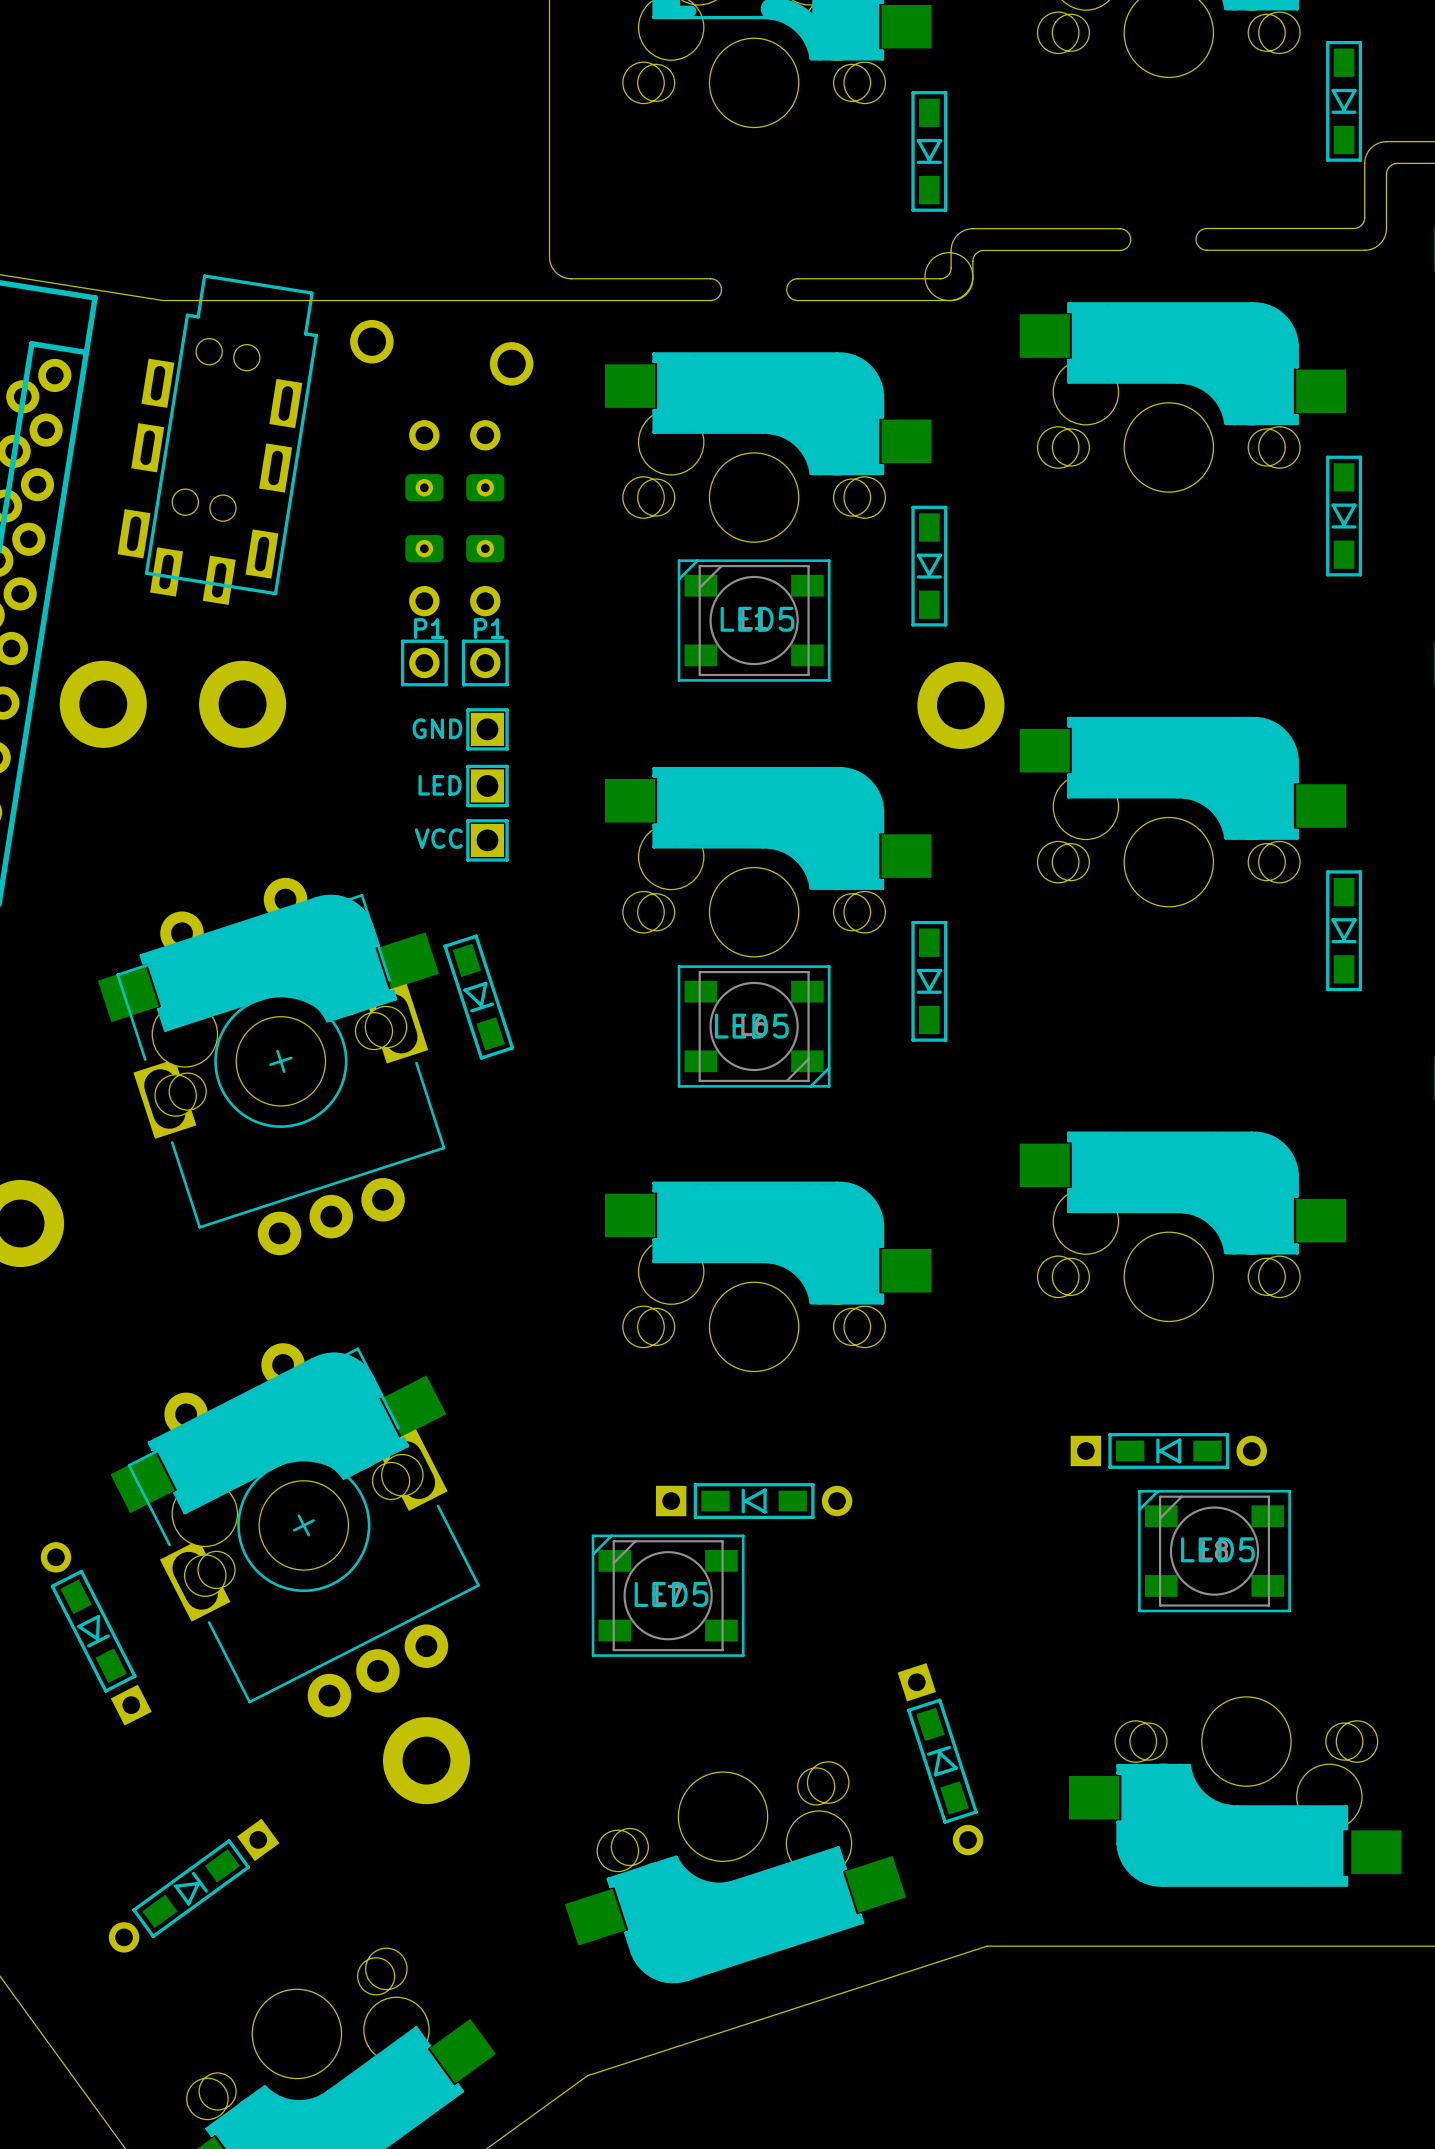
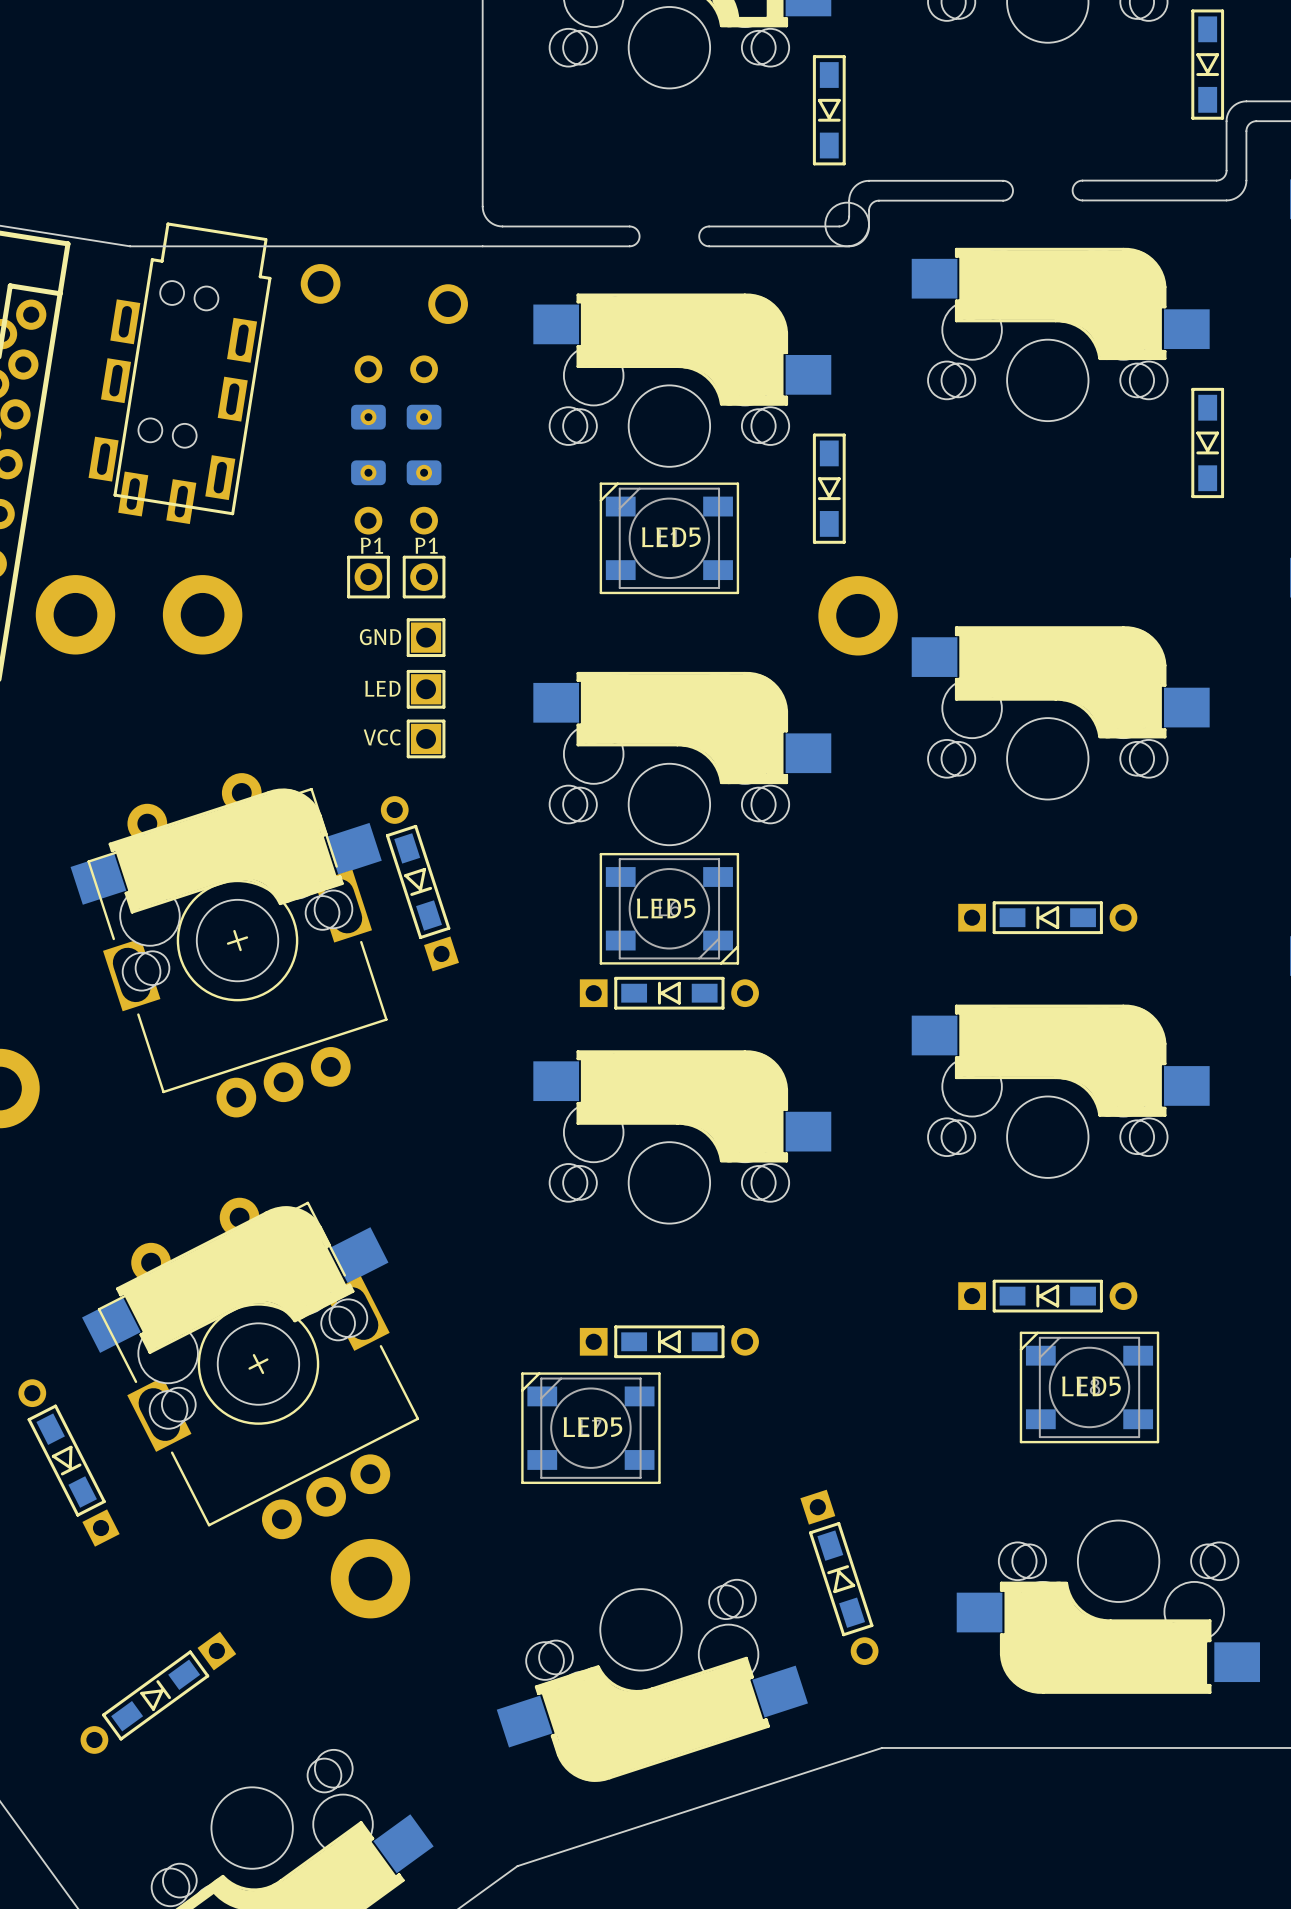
part: (1344, 930) -> none
part footprint: [443, 934, 515, 1060] -> [380, 796, 459, 972]
part: (929, 981) -> none
part: none -> (1047, 917)
part: none -> (669, 993)

